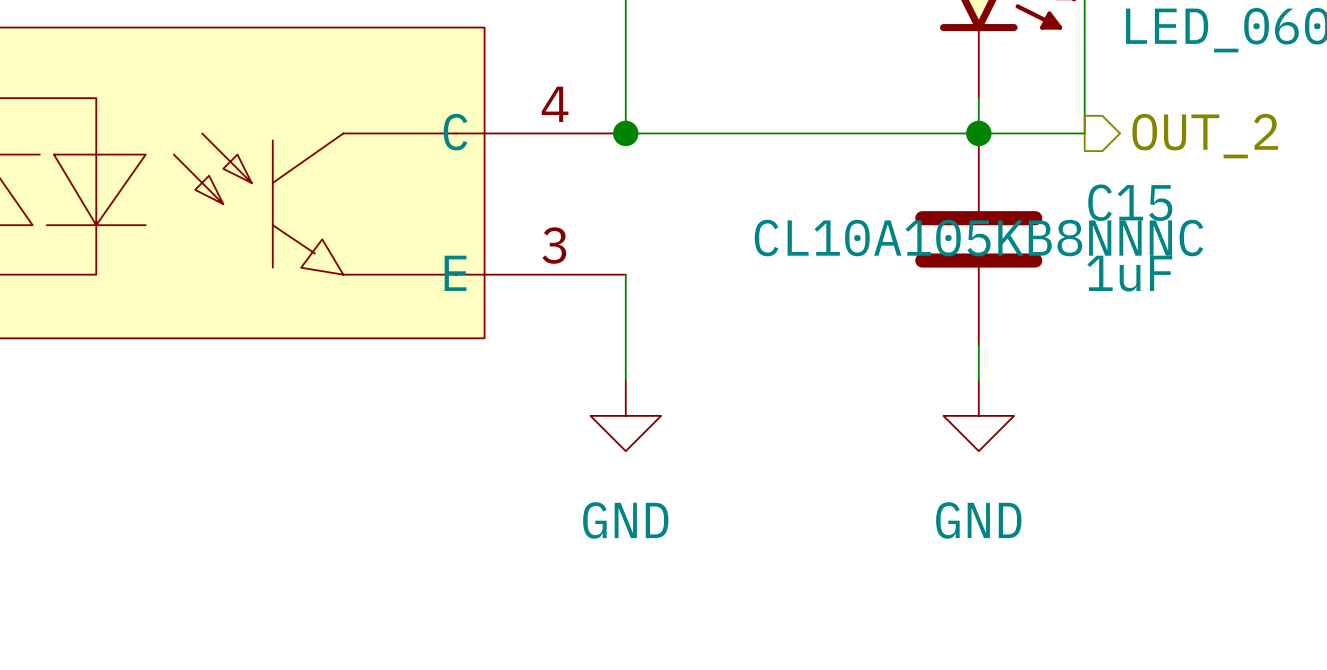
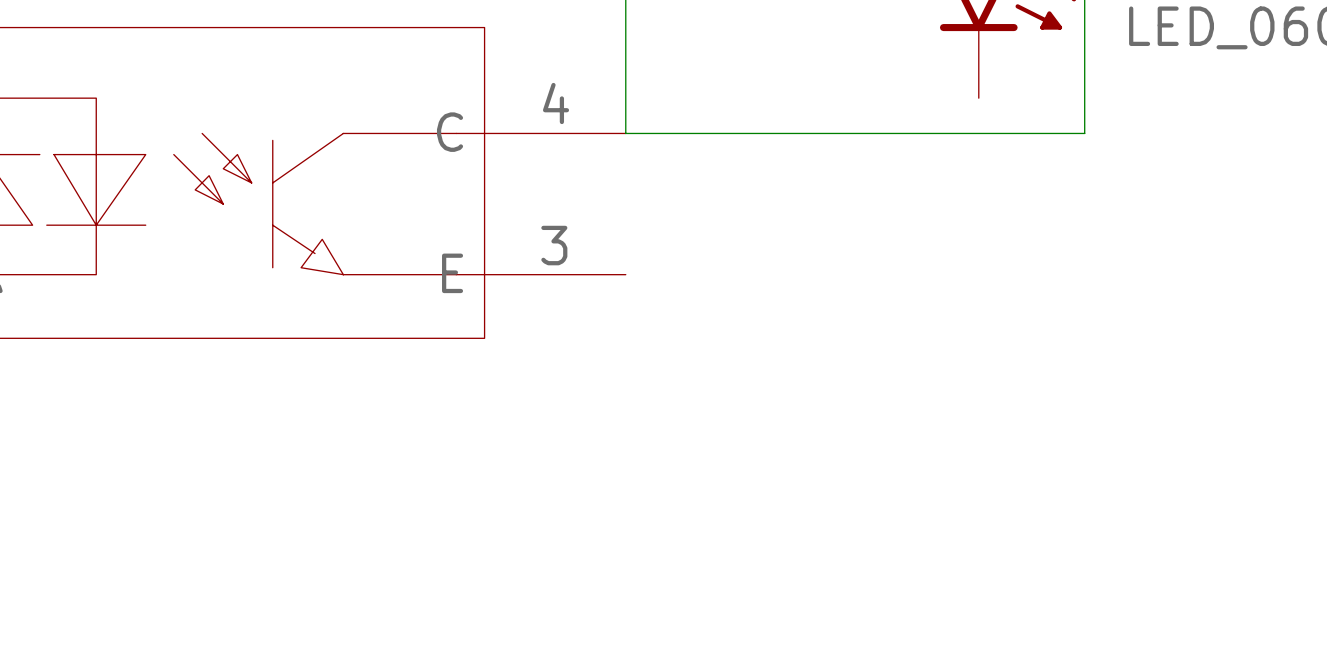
wire: (978, 98) (978, 133) -> none
junction: (625, 133) -> none
junction: (978, 133) -> none
hierarchical label: OUT_2 (1205, 136) -> none
C15: 1uF (978, 239) -> none
wire: (625, 274) (625, 380) -> none
wire: (978, 345) (978, 380) -> none
power symbol: GND (625, 415) -> none
power symbol: GND (978, 415) -> none

